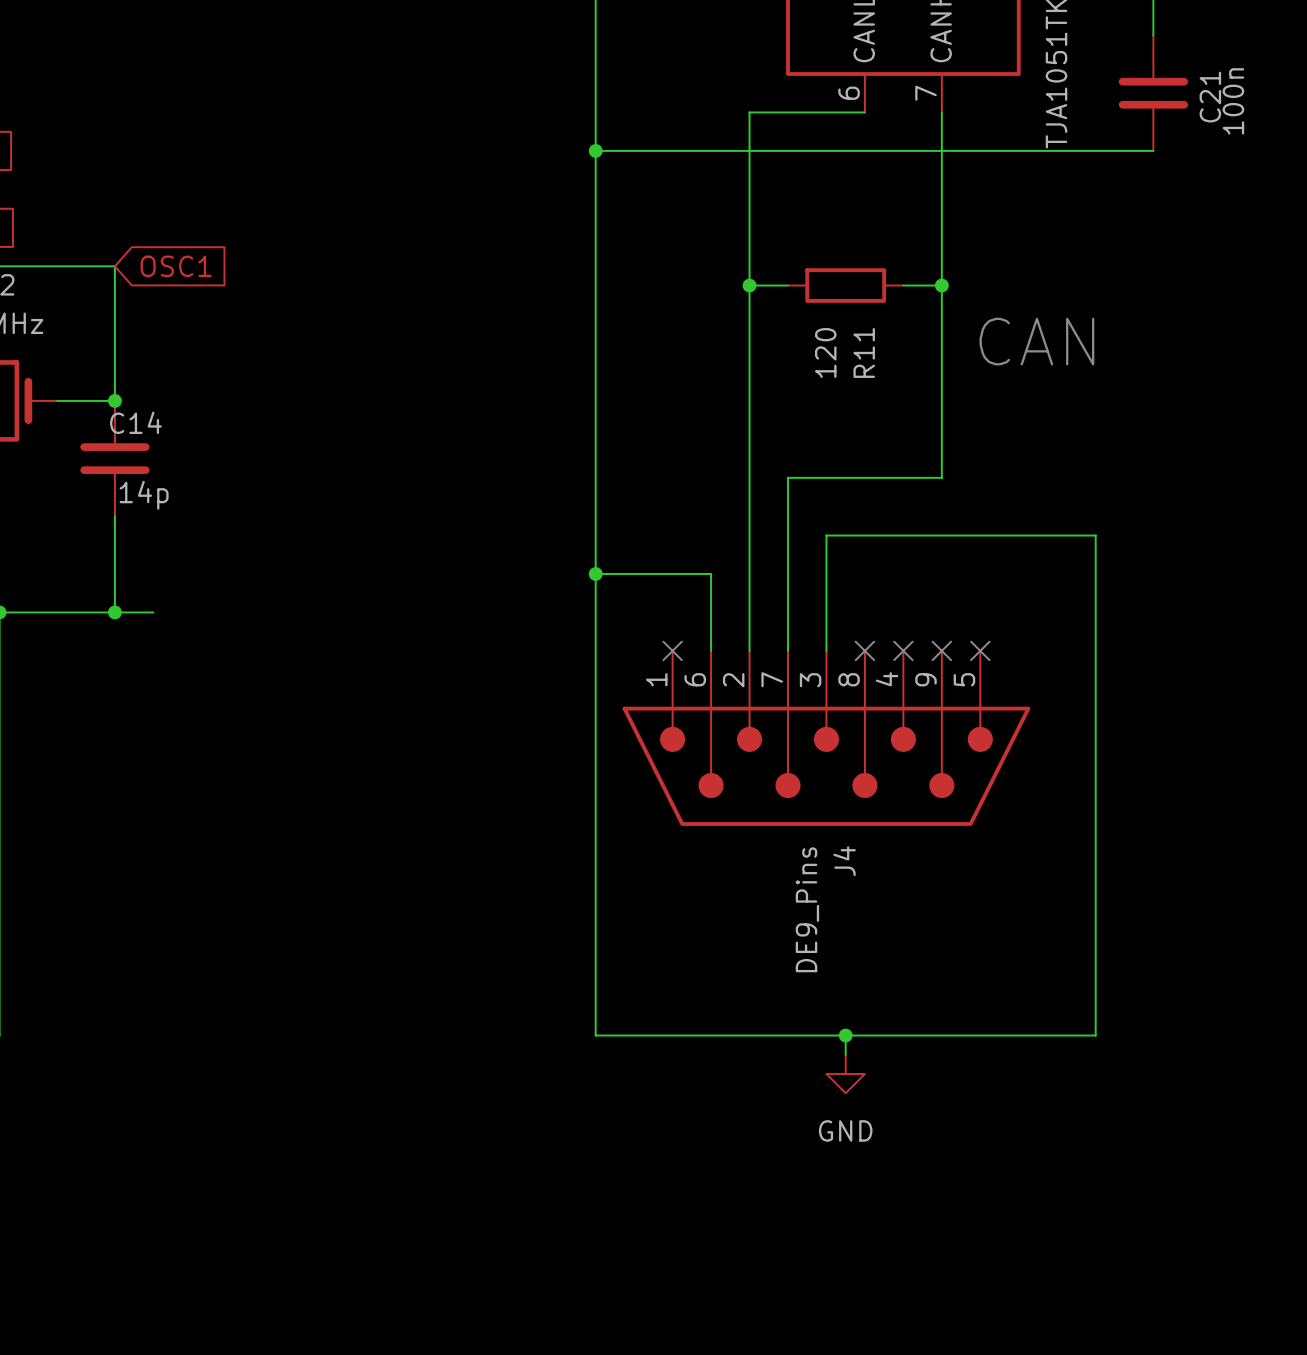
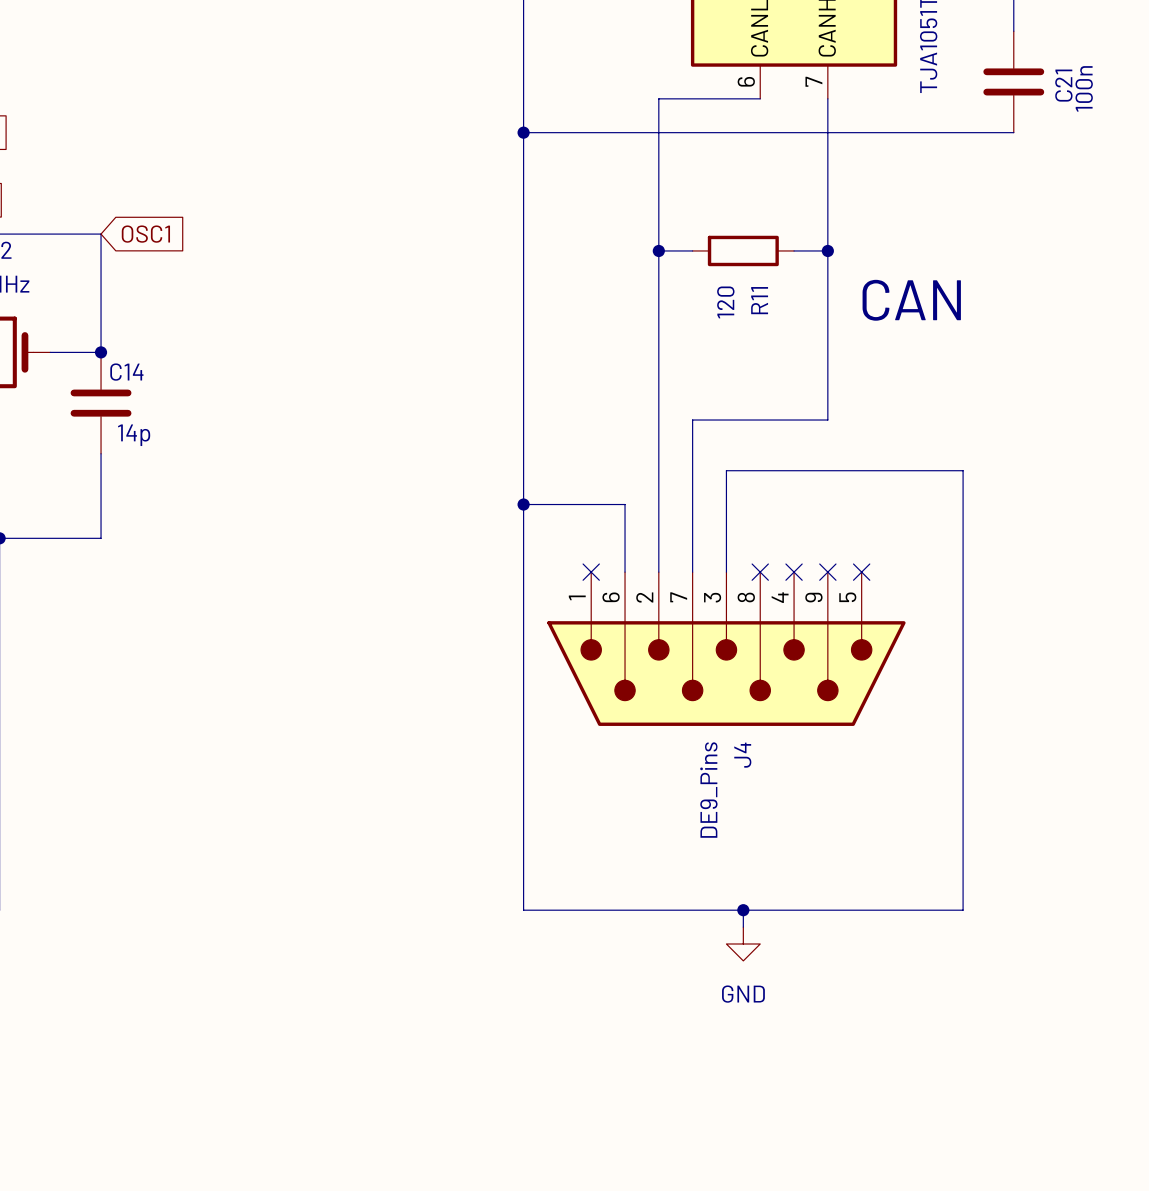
wire: (114, 612) (153, 612) -> none
junction: (114, 612) -> none

